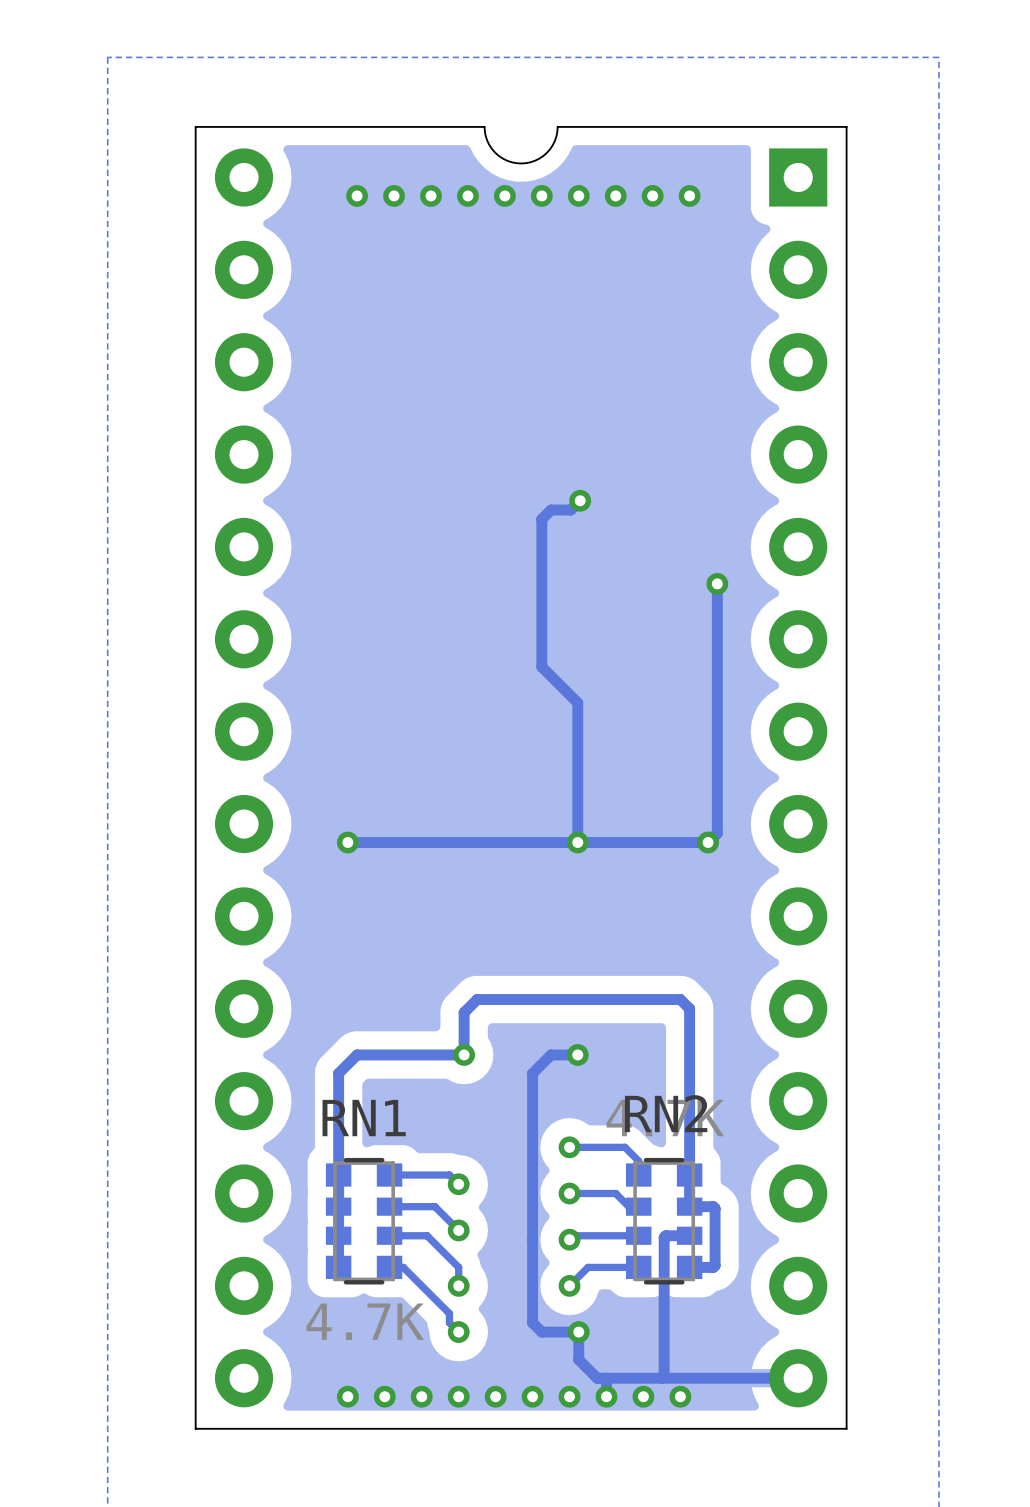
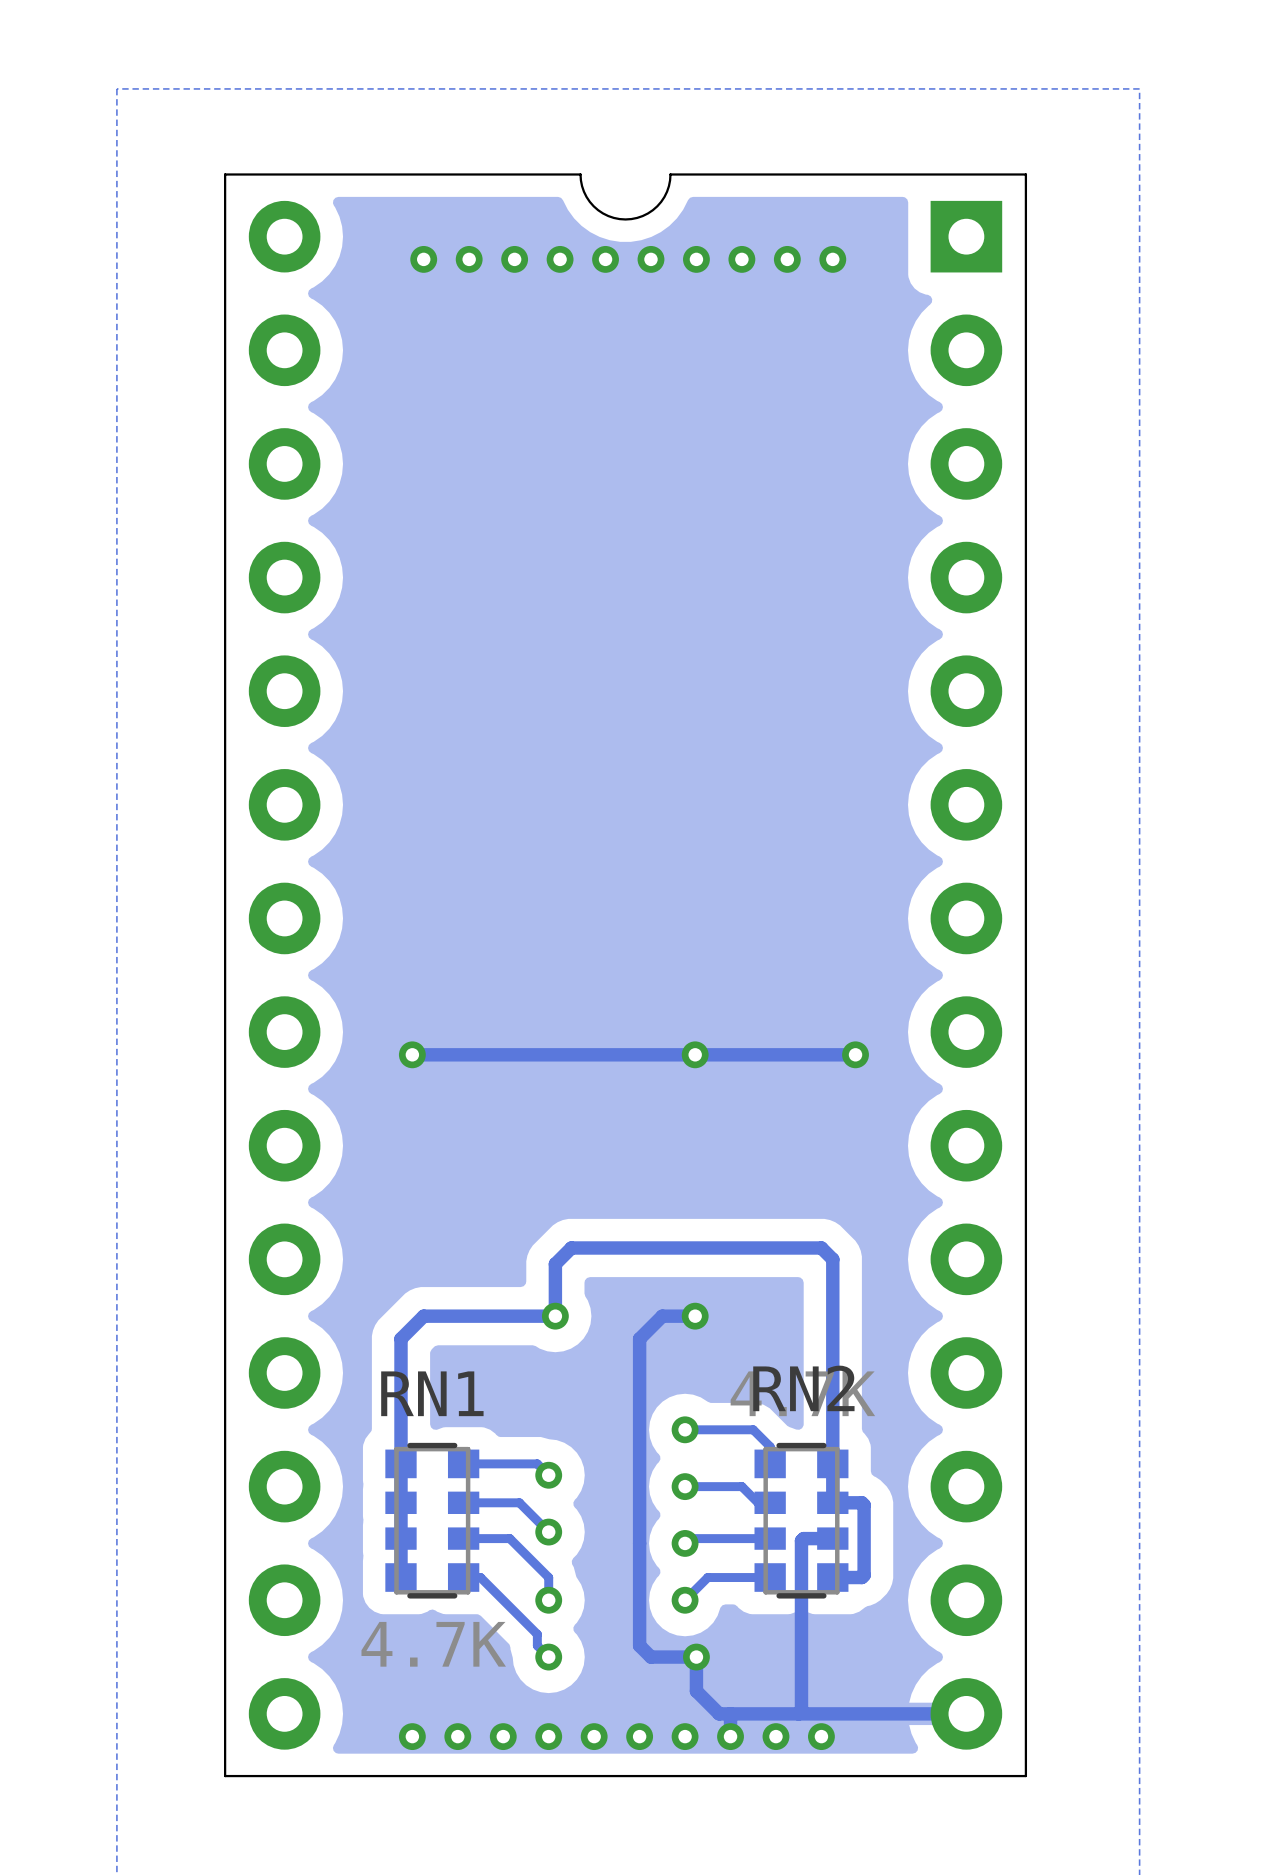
track: (580, 500) (570, 510) (551, 510) (541, 519) (541, 667) (577, 702) (577, 842) -> none
via: (580, 500) -> none
track: (717, 583) (717, 833) (708, 842) -> none
via: (717, 583) -> none

